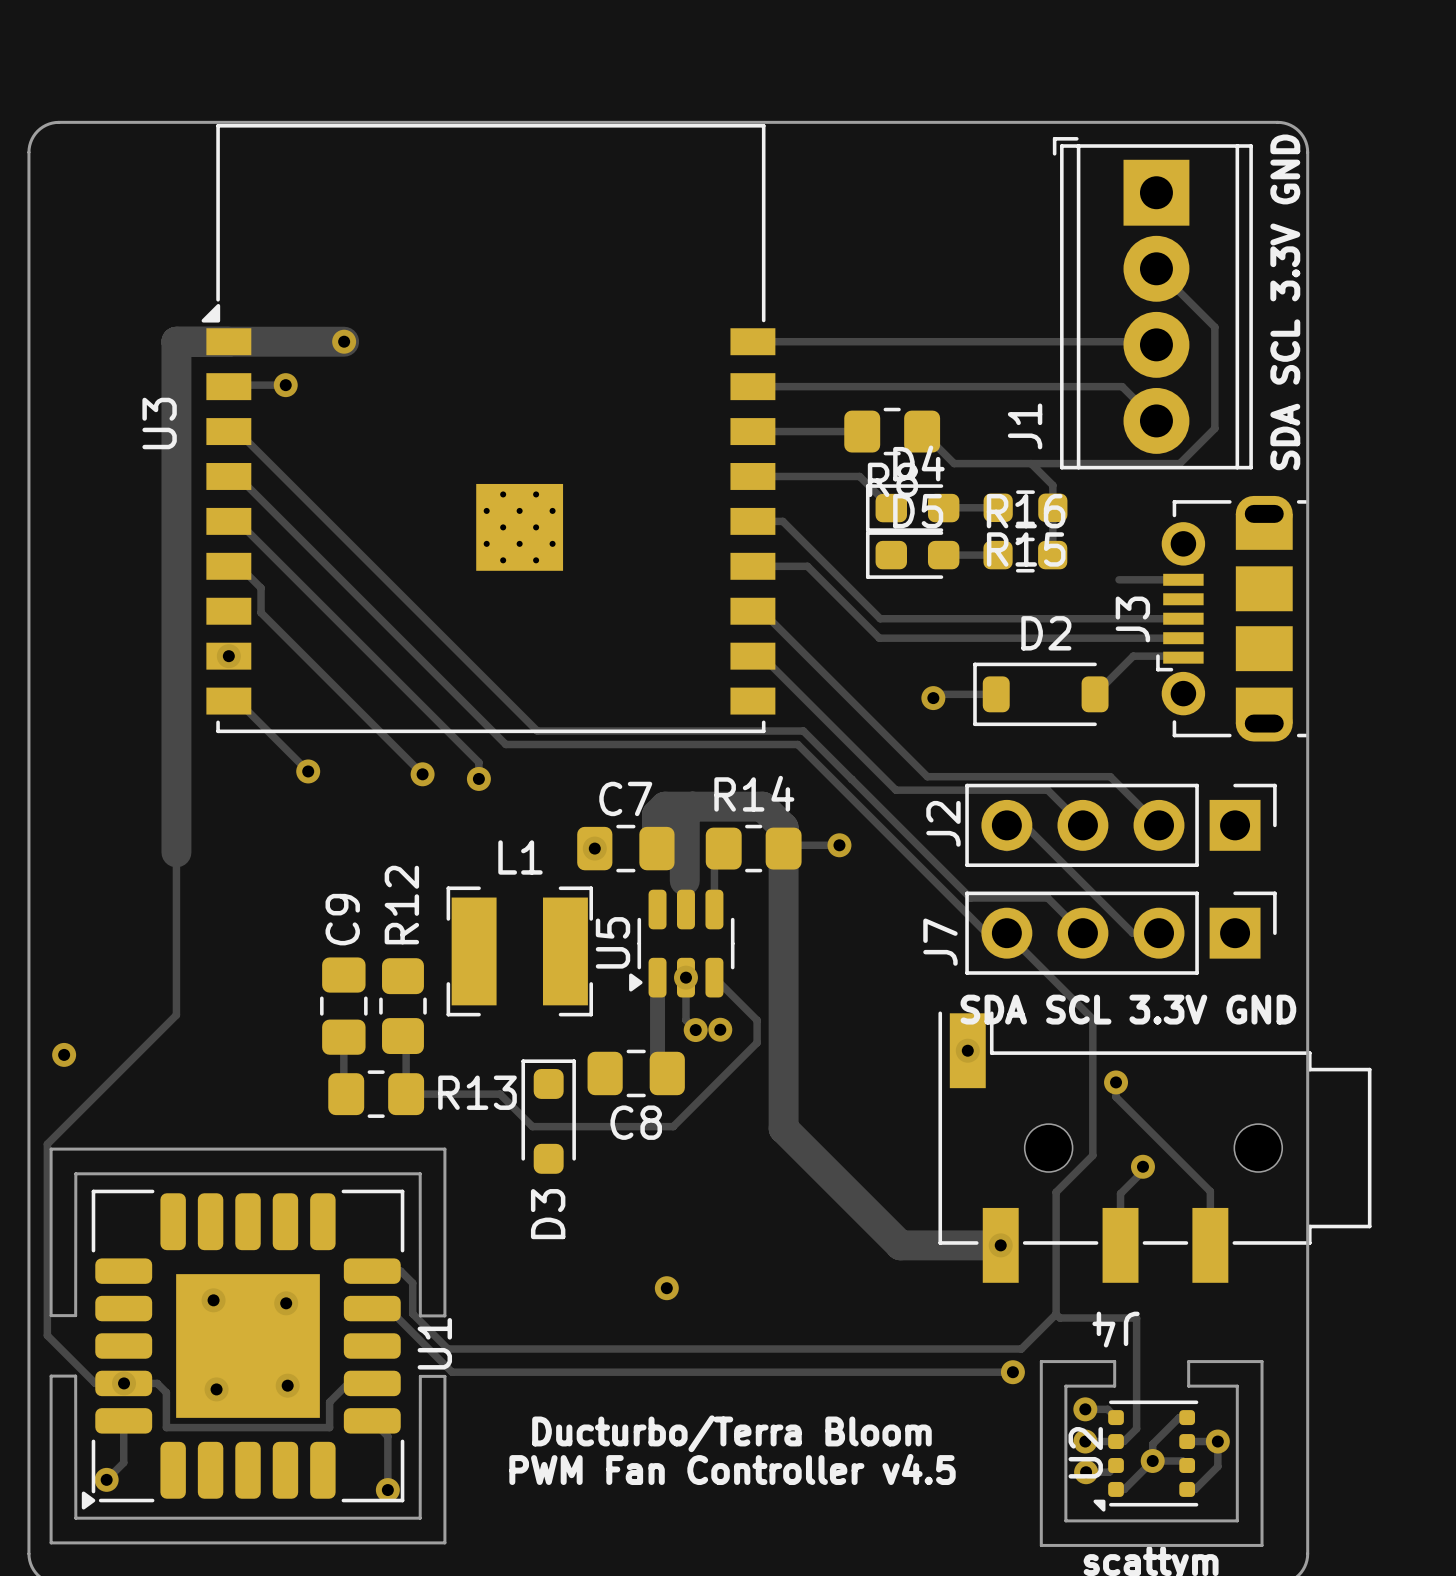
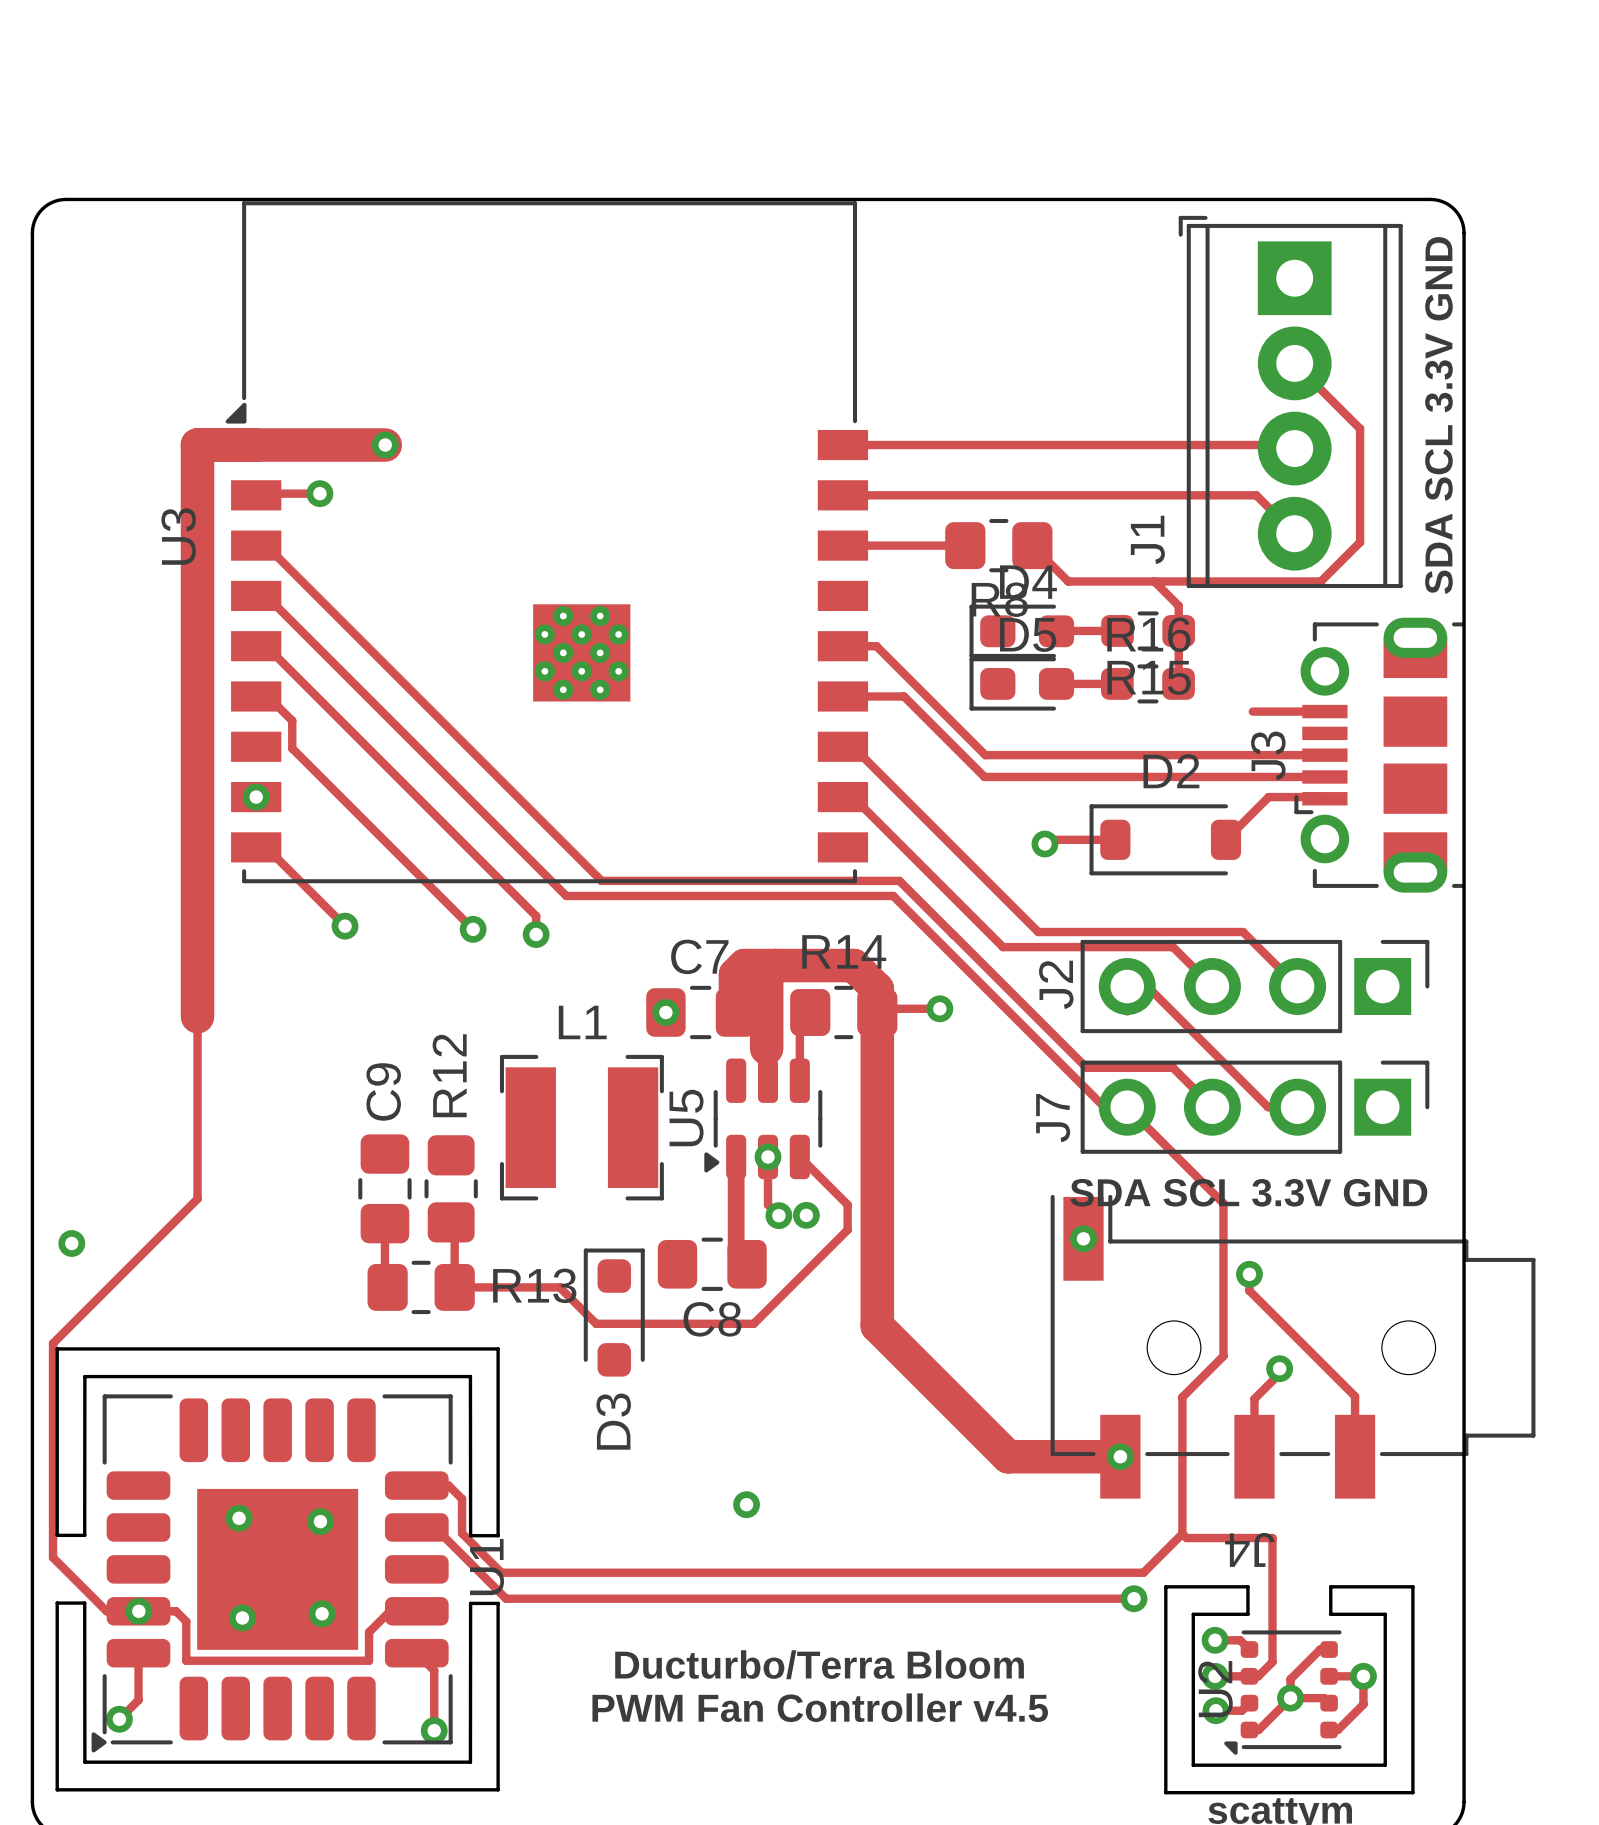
track: (752, 476) (859, 476) (891, 508) -> none

